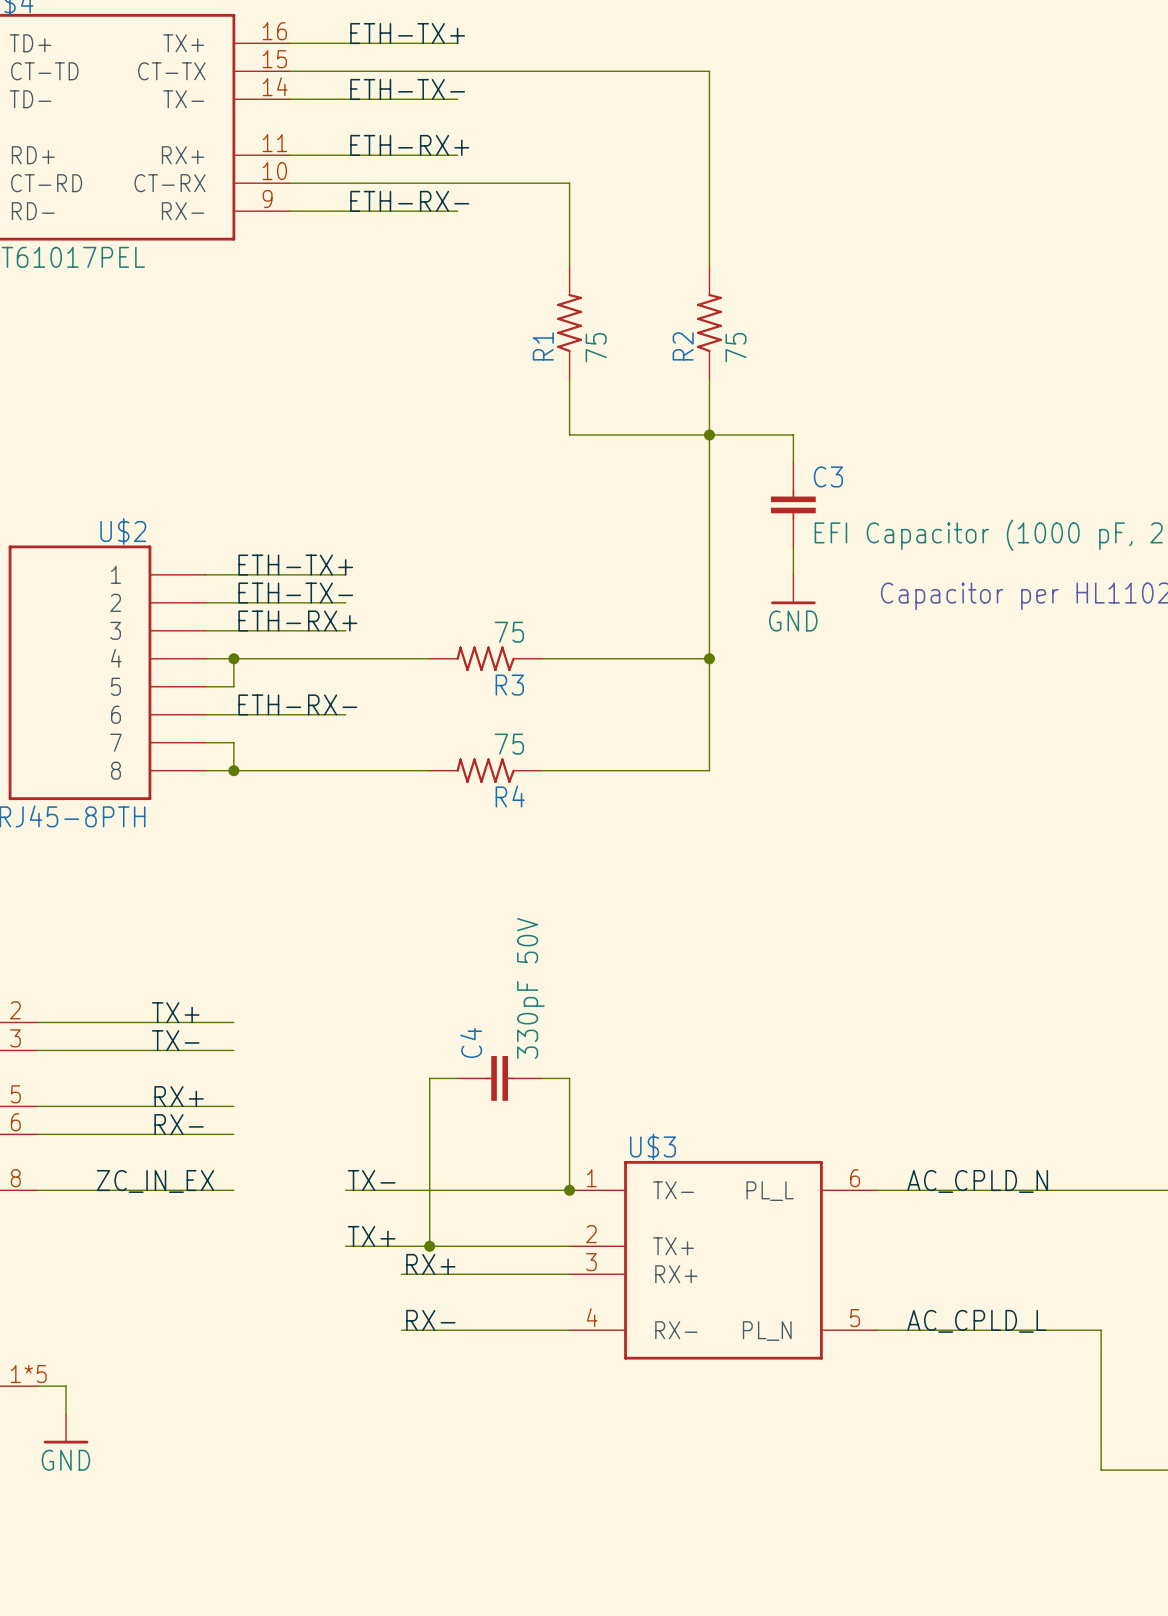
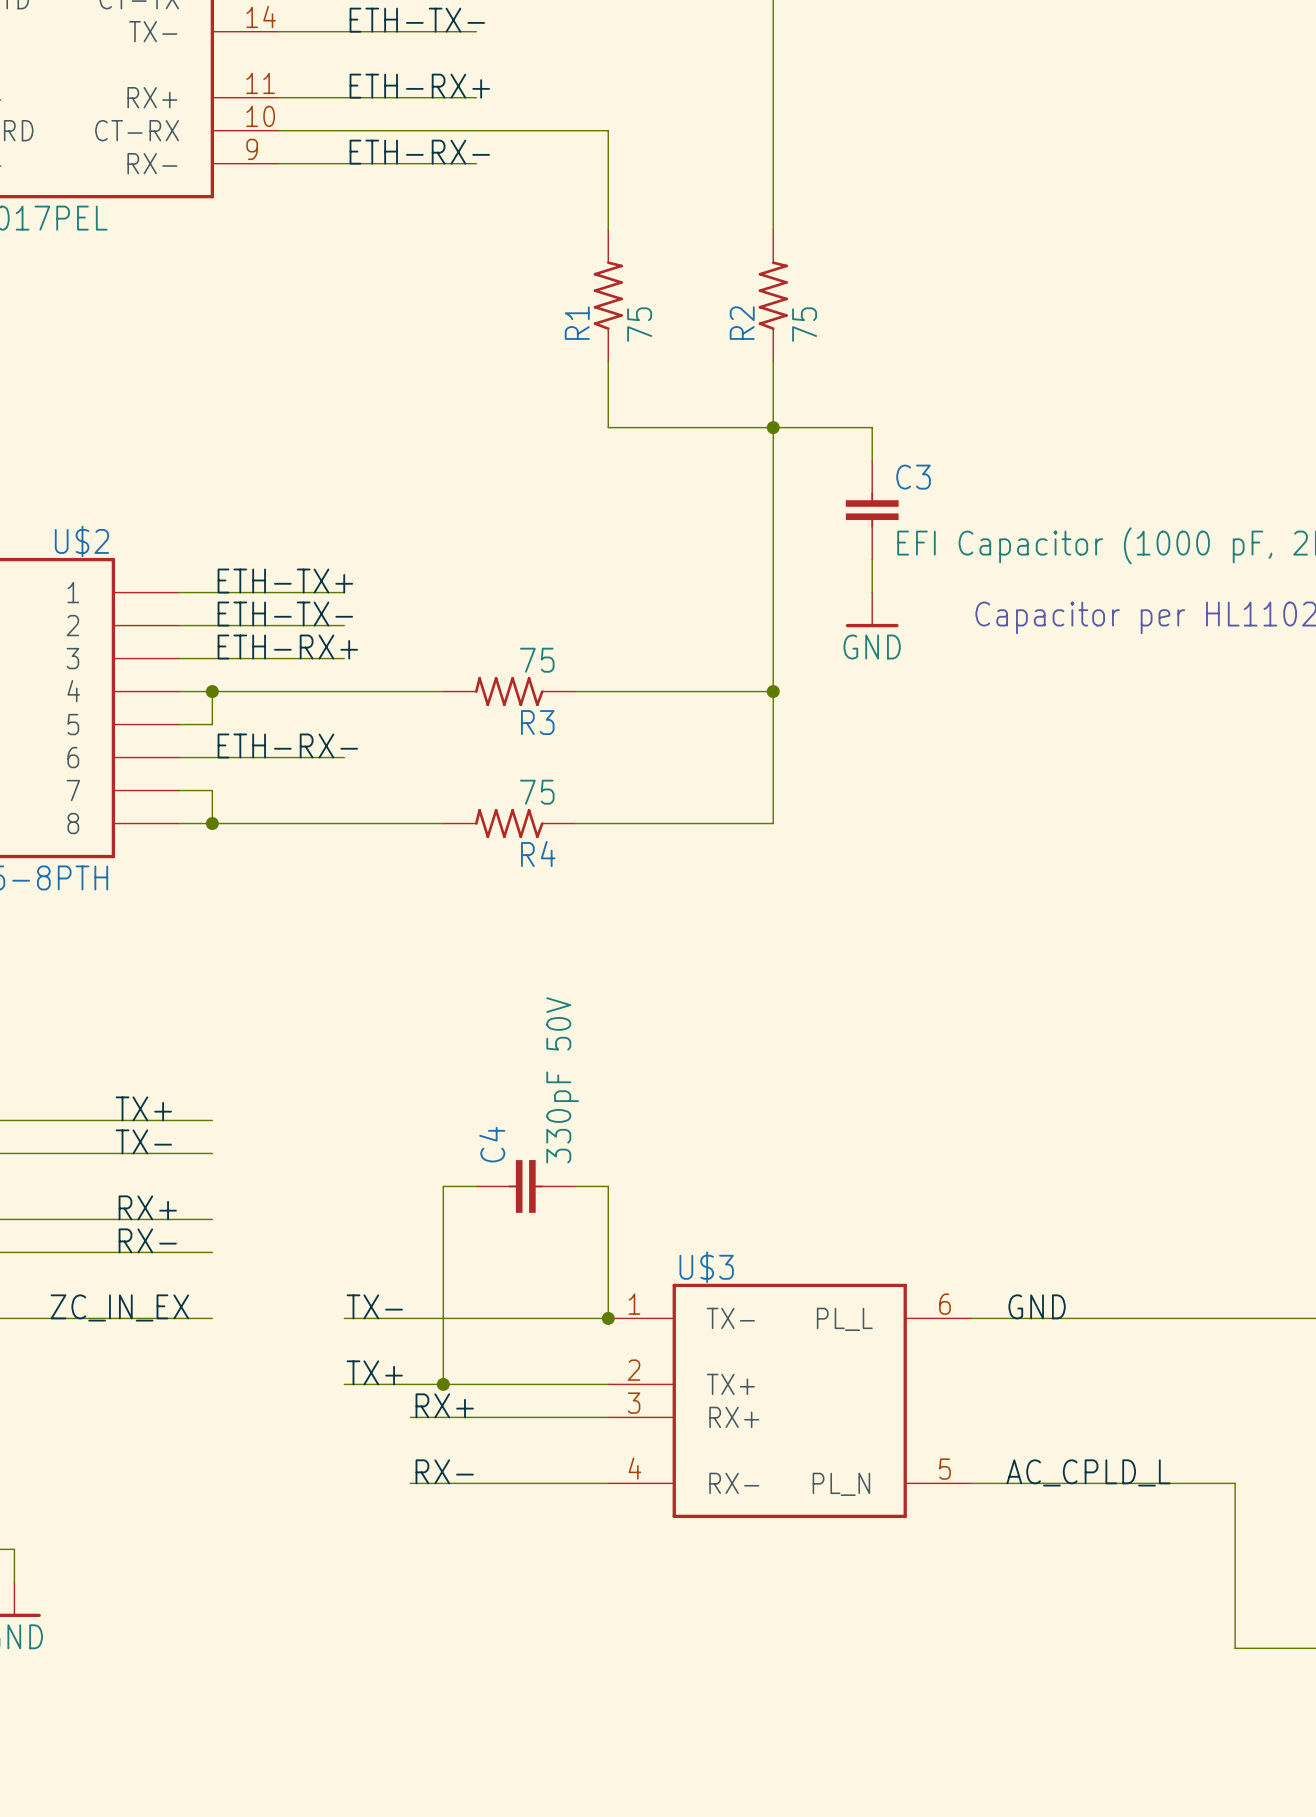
label: AC_CPLD_N (977, 1181) -> GND (1037, 1306)

